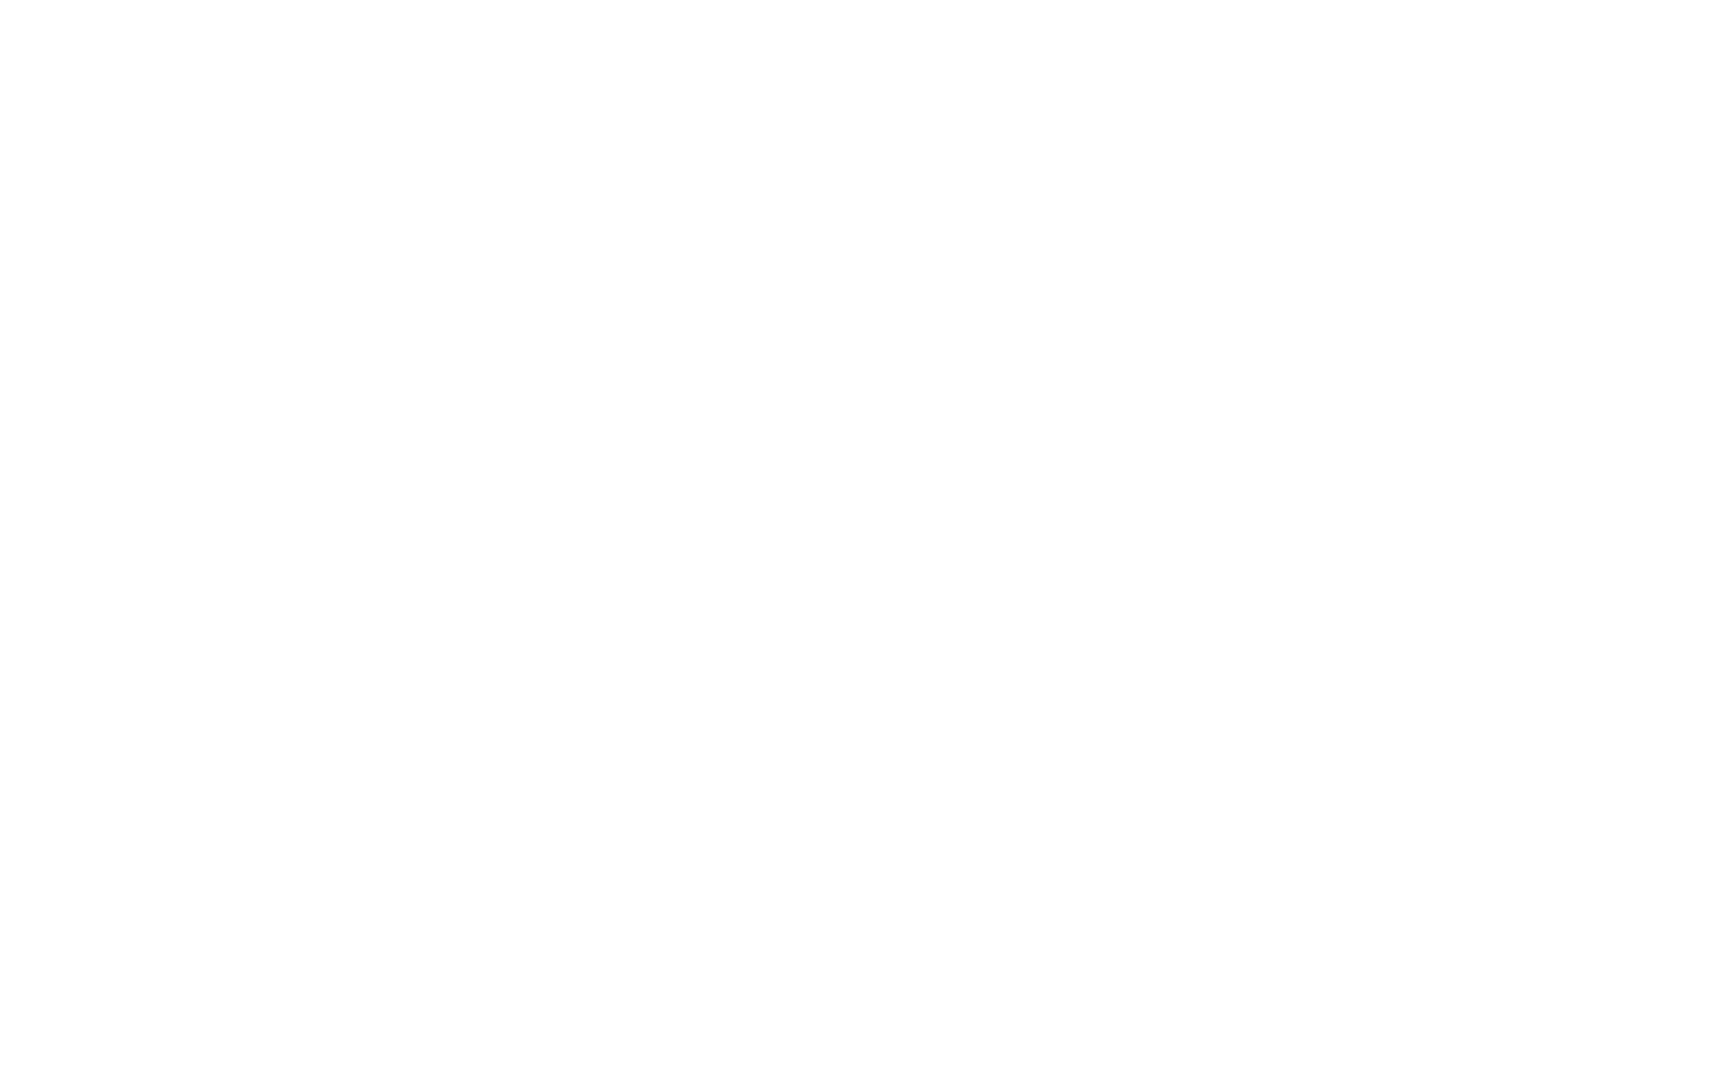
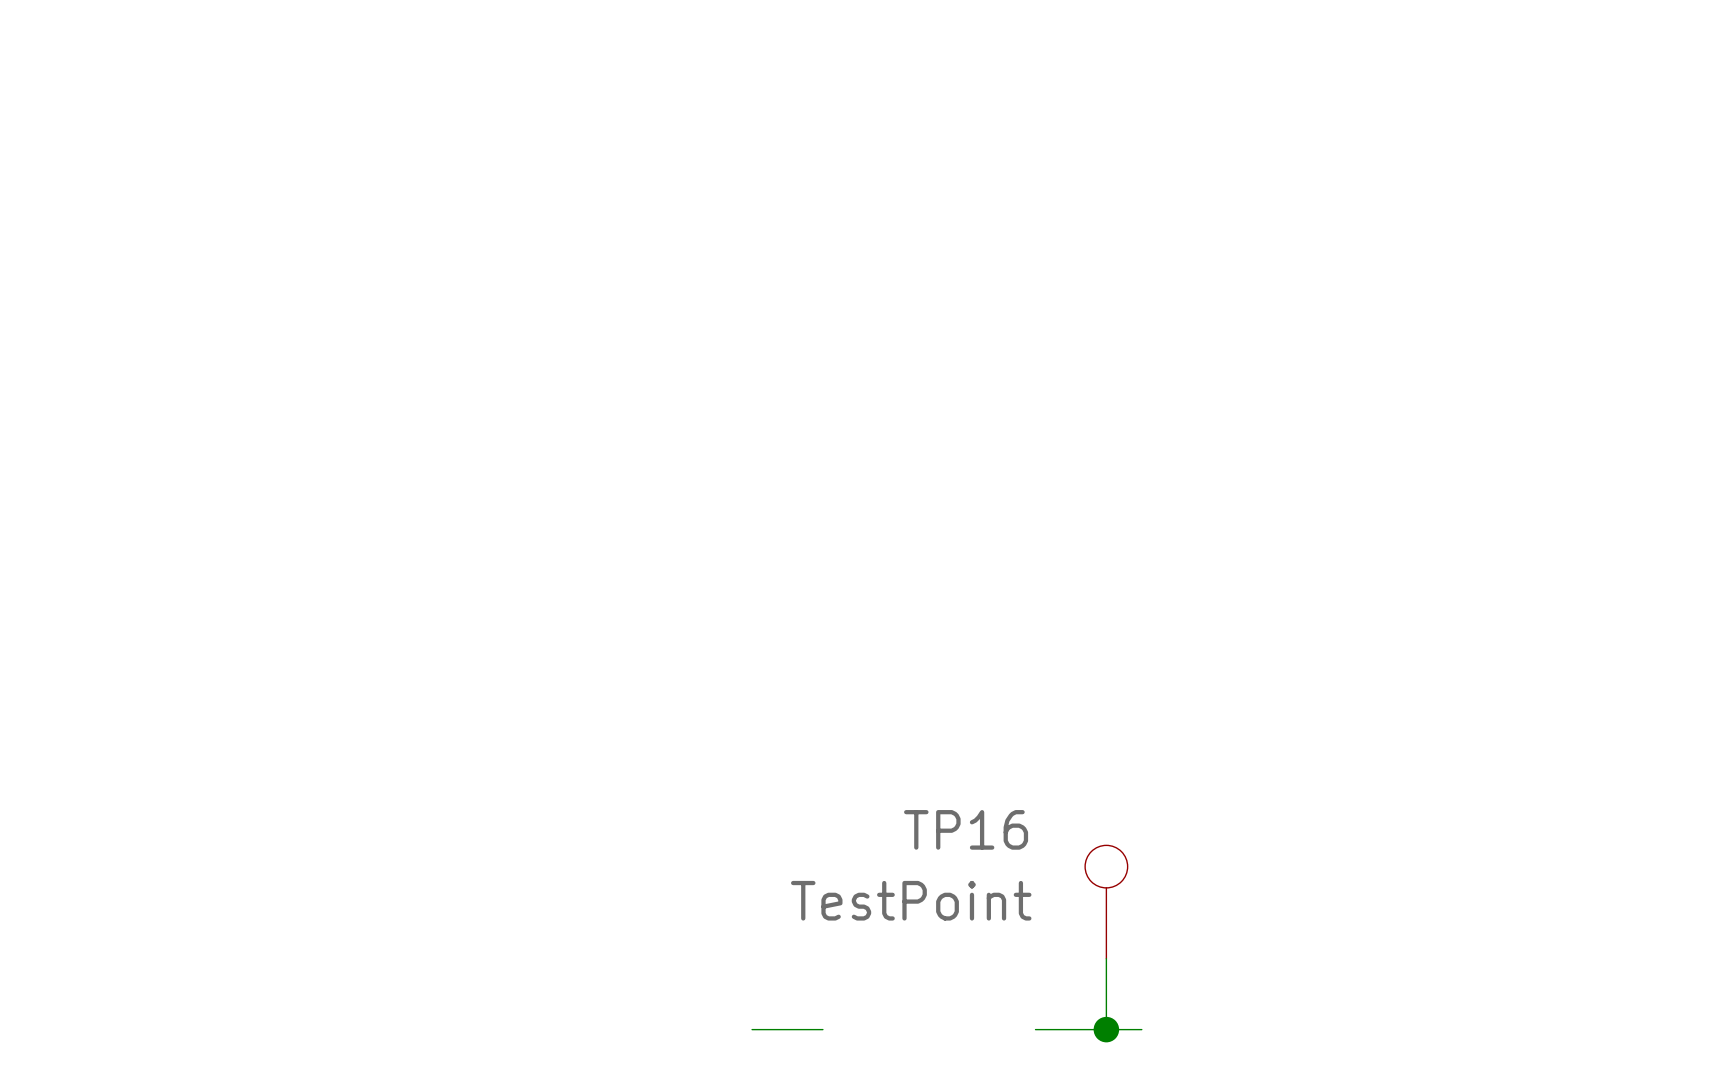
TP16: none -> TestPoint (1106, 902)
wire: none -> (1106, 958) (1106, 1029)
wire: none -> (752, 1029) (822, 1029)
wire: none -> (1035, 1029) (1141, 1029)
junction: none -> (1106, 1029)

